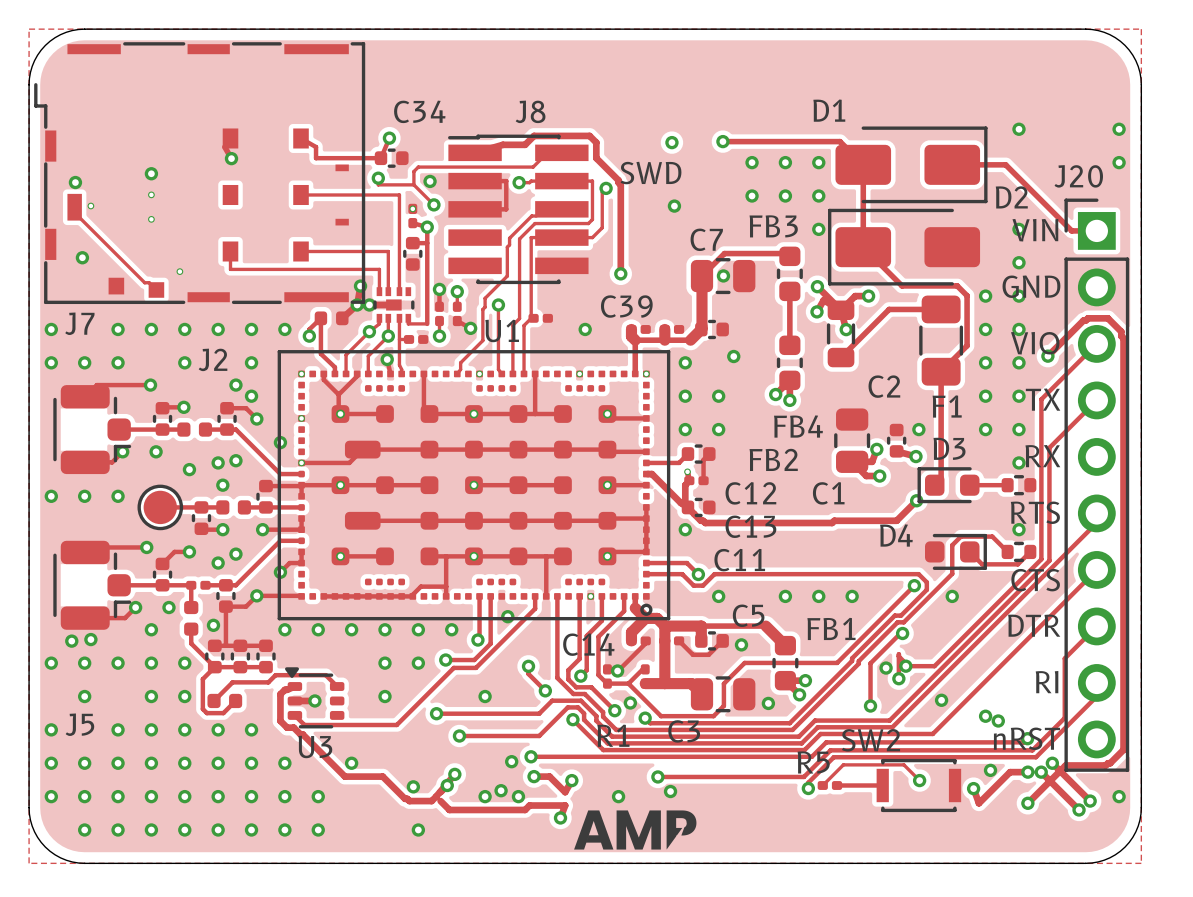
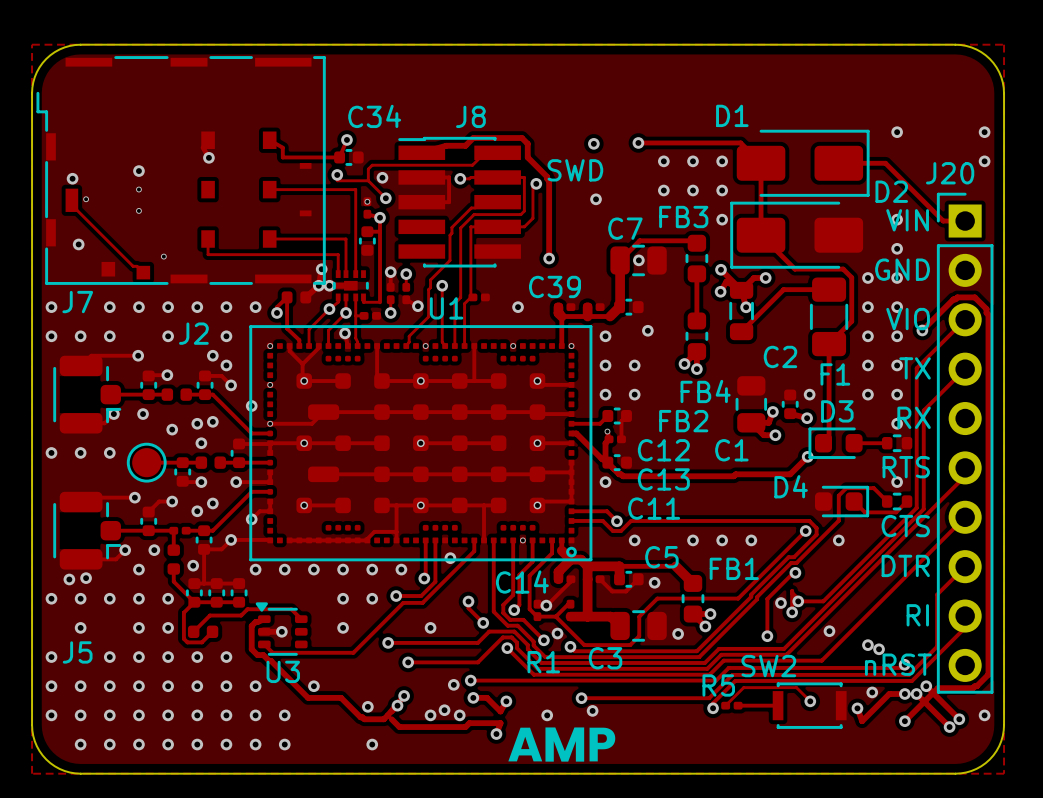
drawing: [574, 810, 614, 850] -> none
drawing: none -> [508, 727, 543, 762]
drawing shape: [666, 810, 697, 850] -> [589, 738, 616, 762]
drawing: none -> [589, 727, 616, 739]

